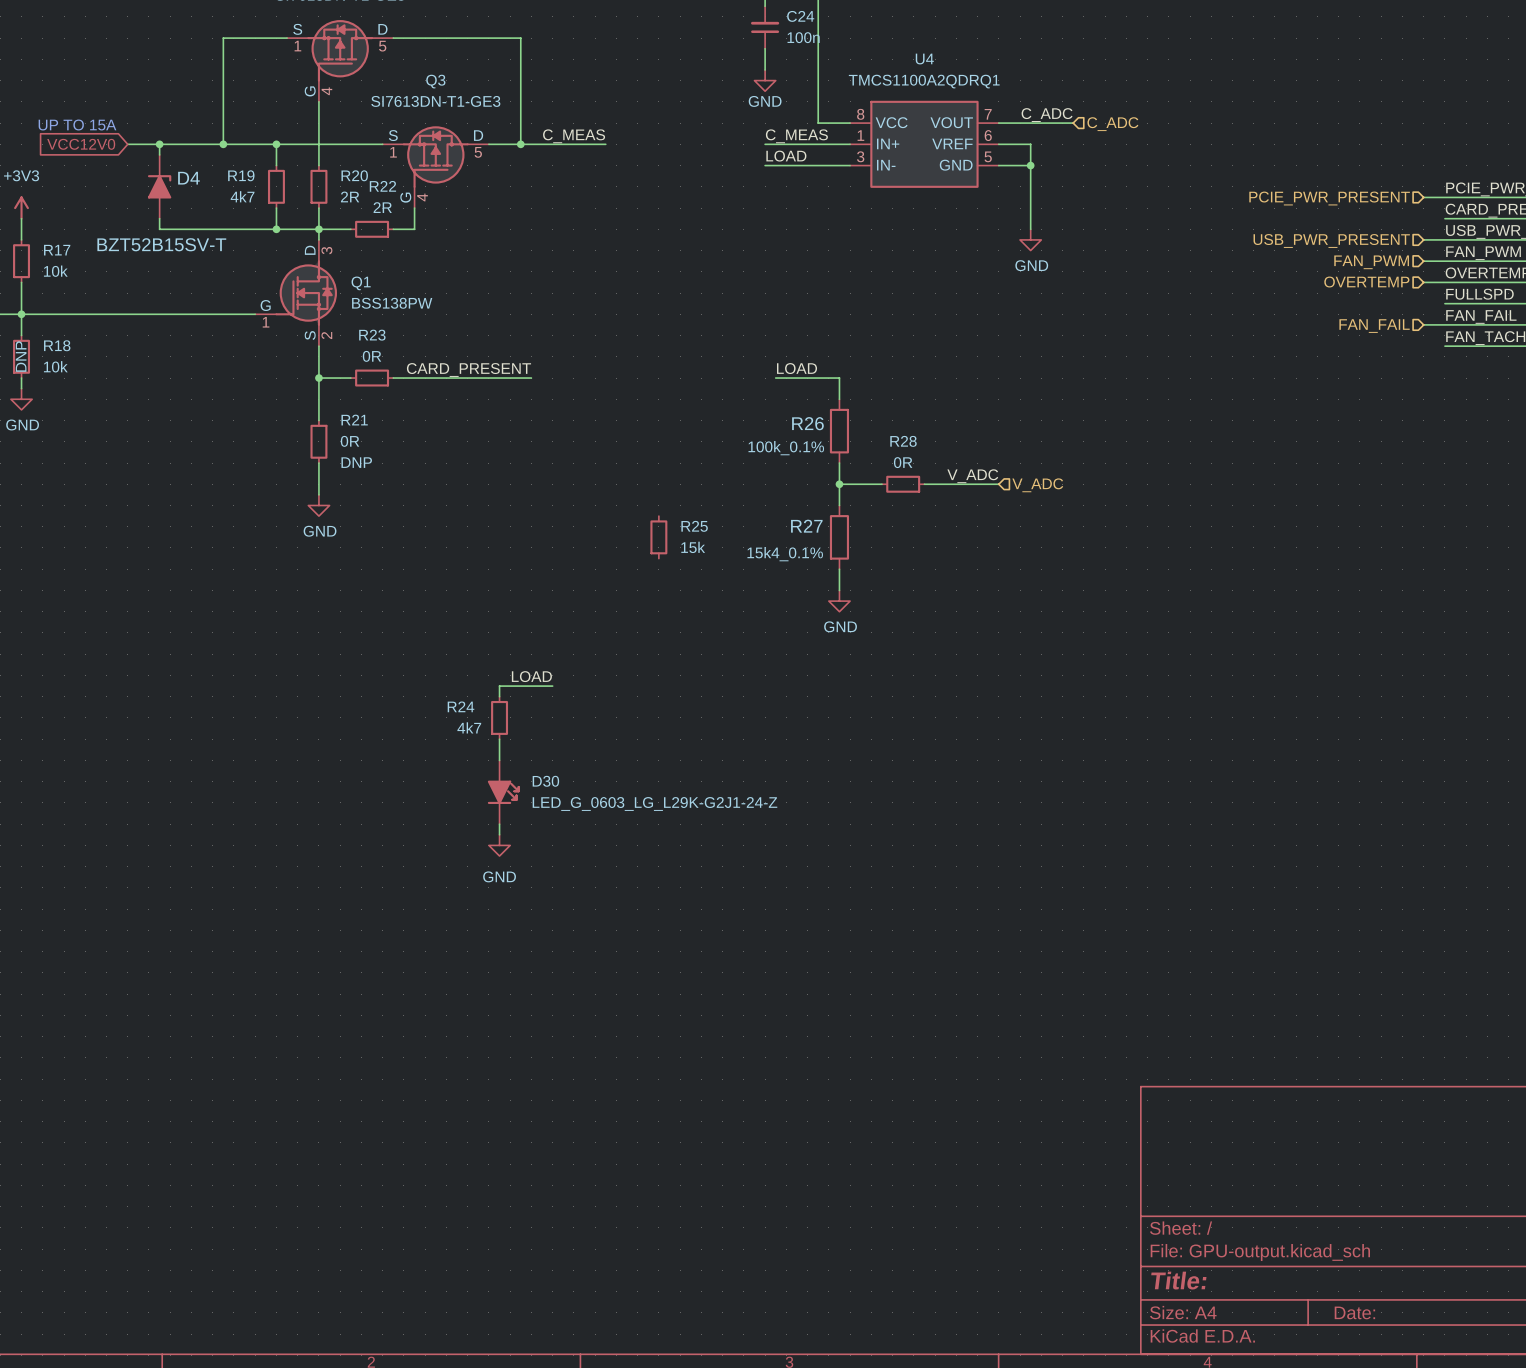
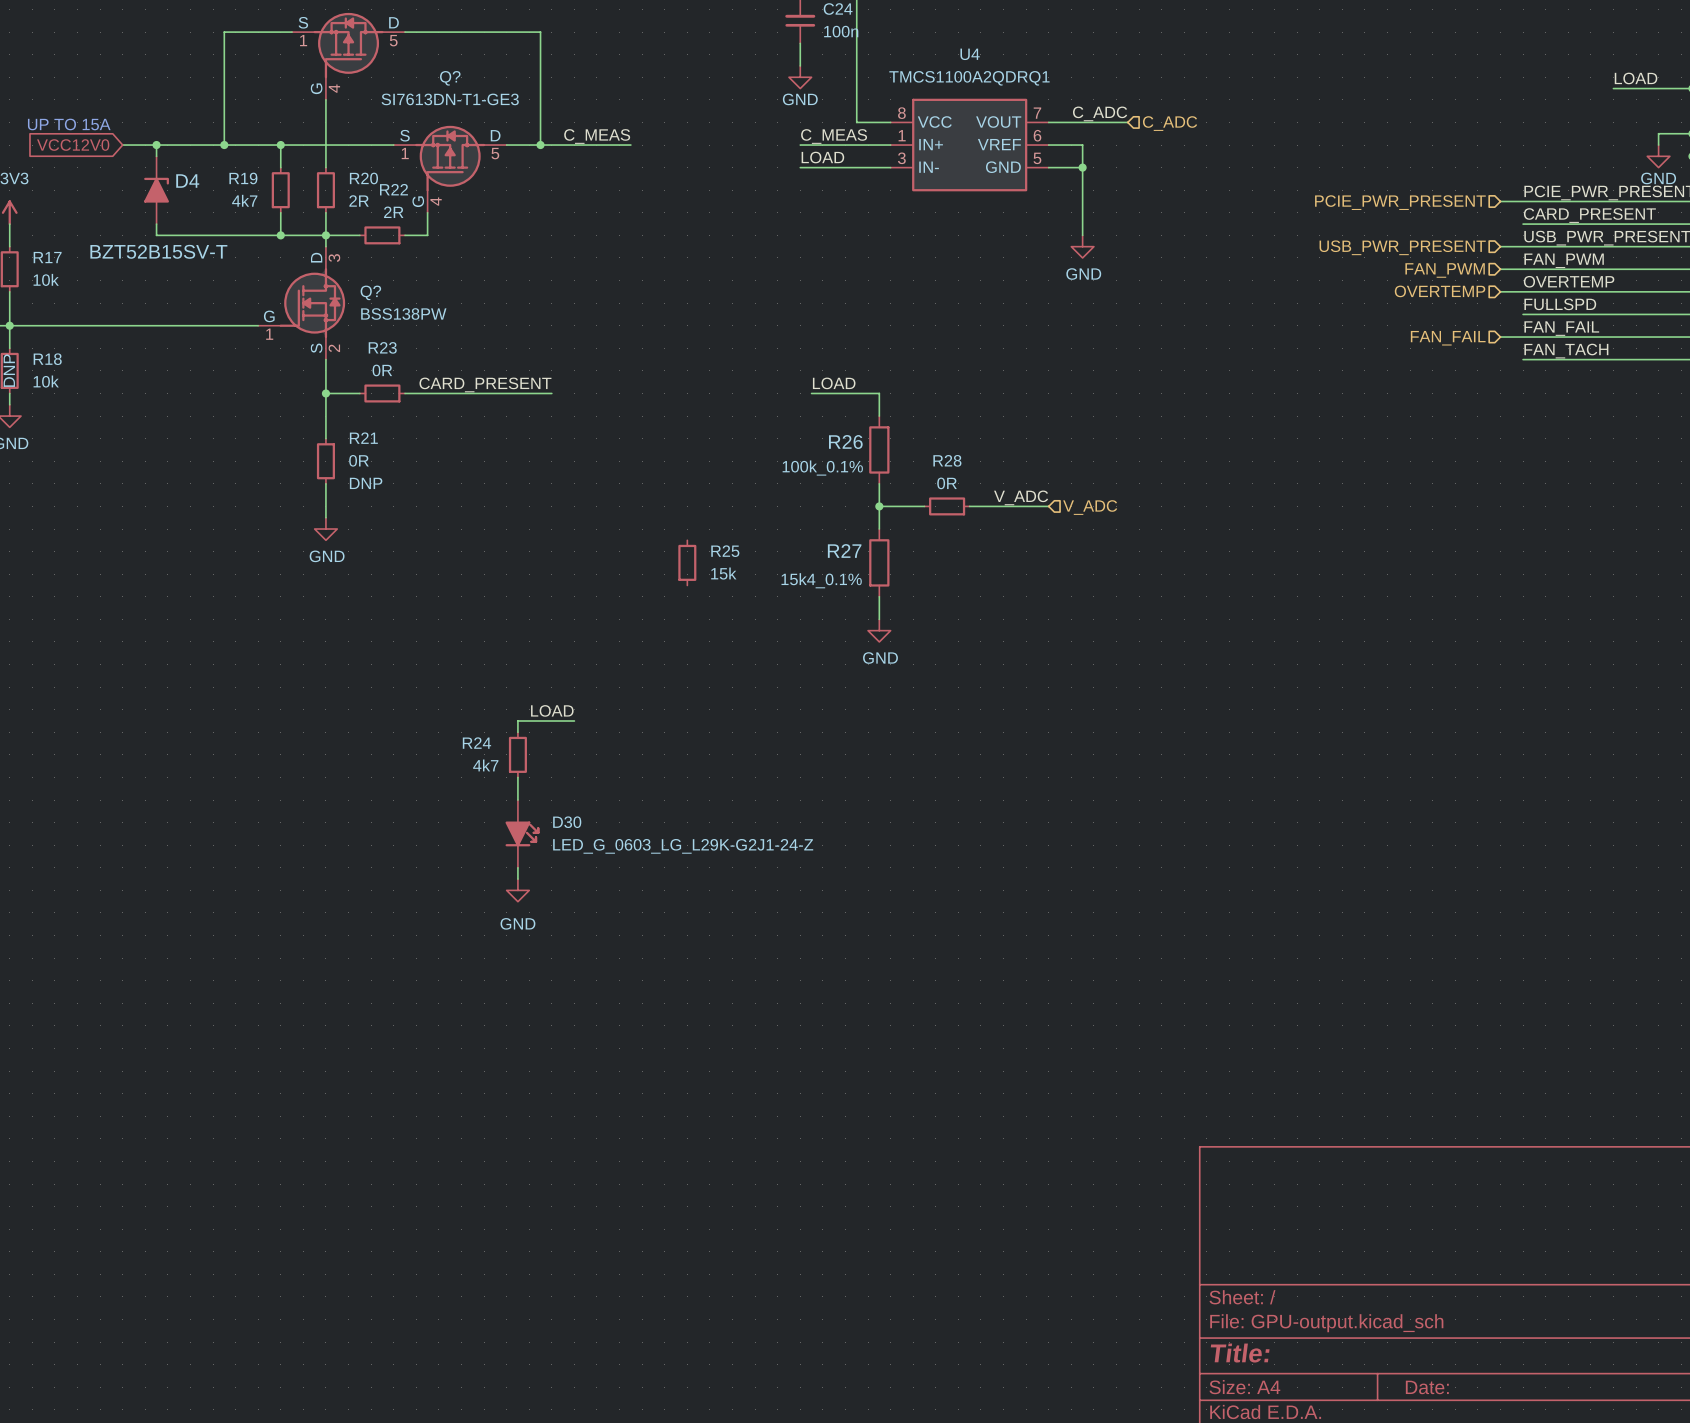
Q3 name: Q3 (435, 81) -> Q? (450, 78)
Q1 name: Q1 (361, 283) -> Q? (370, 292)

